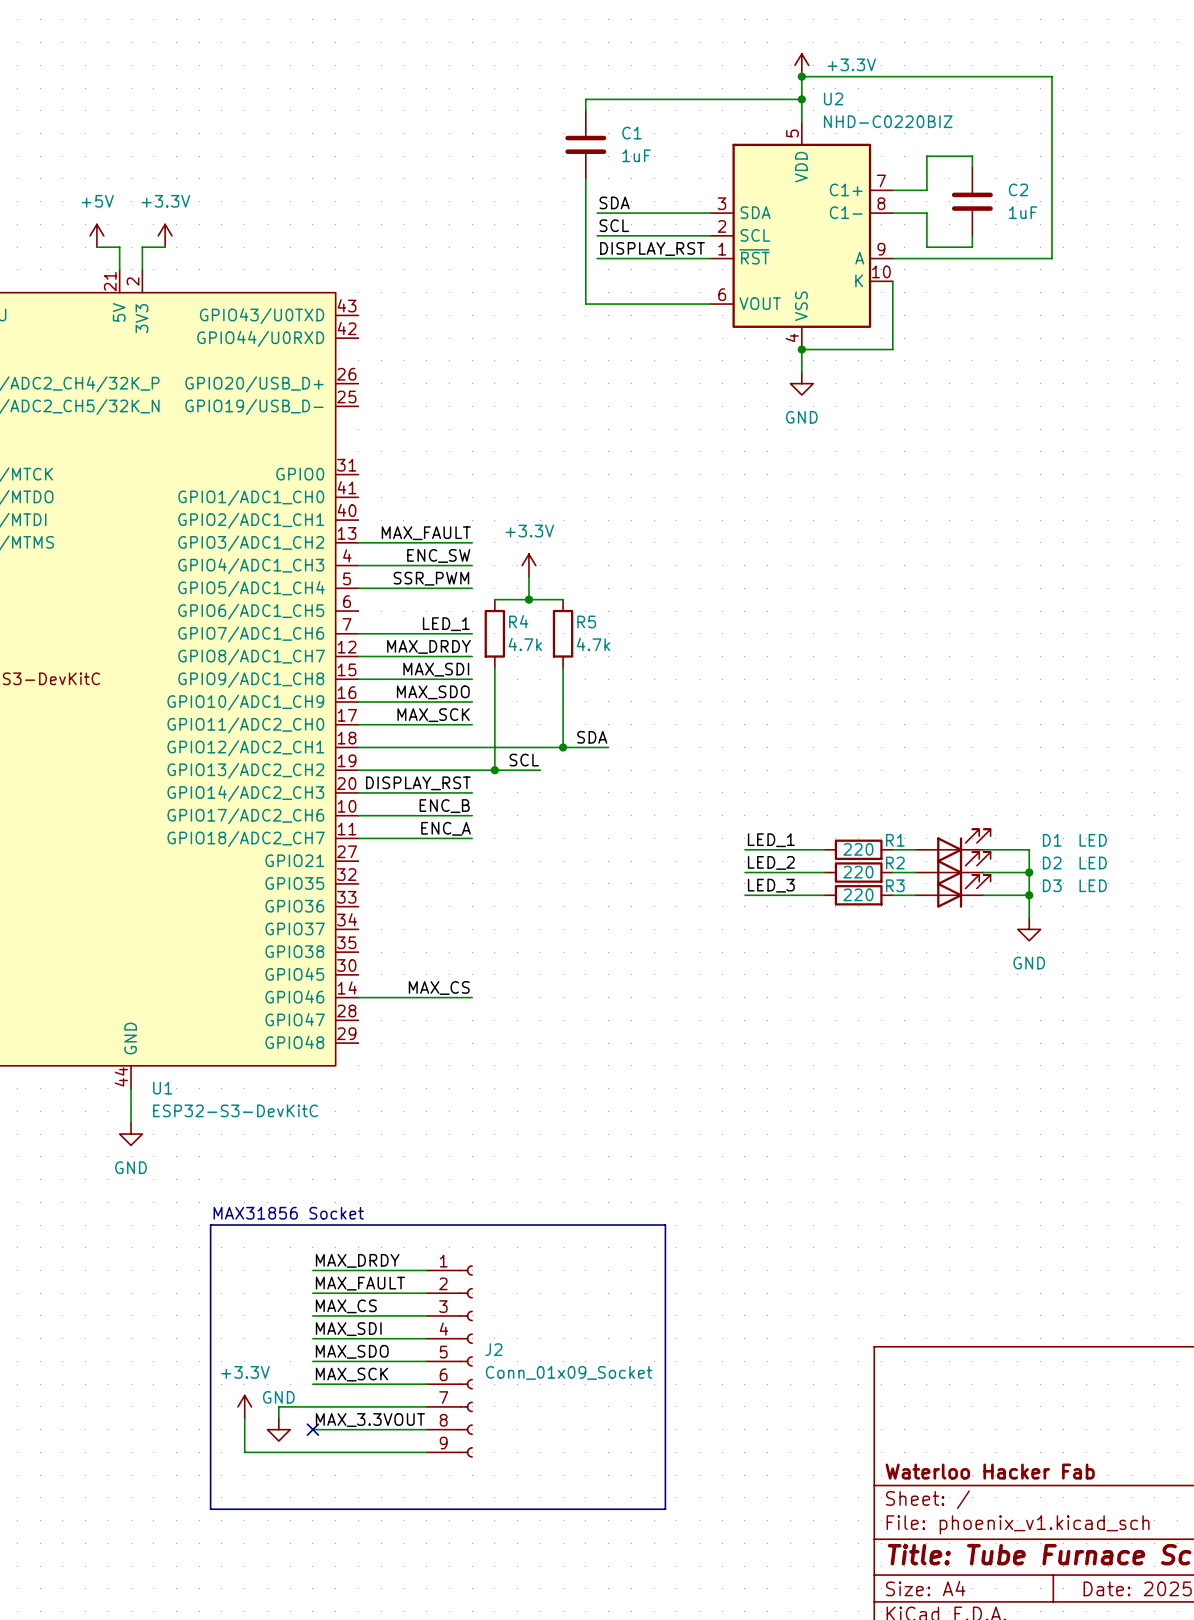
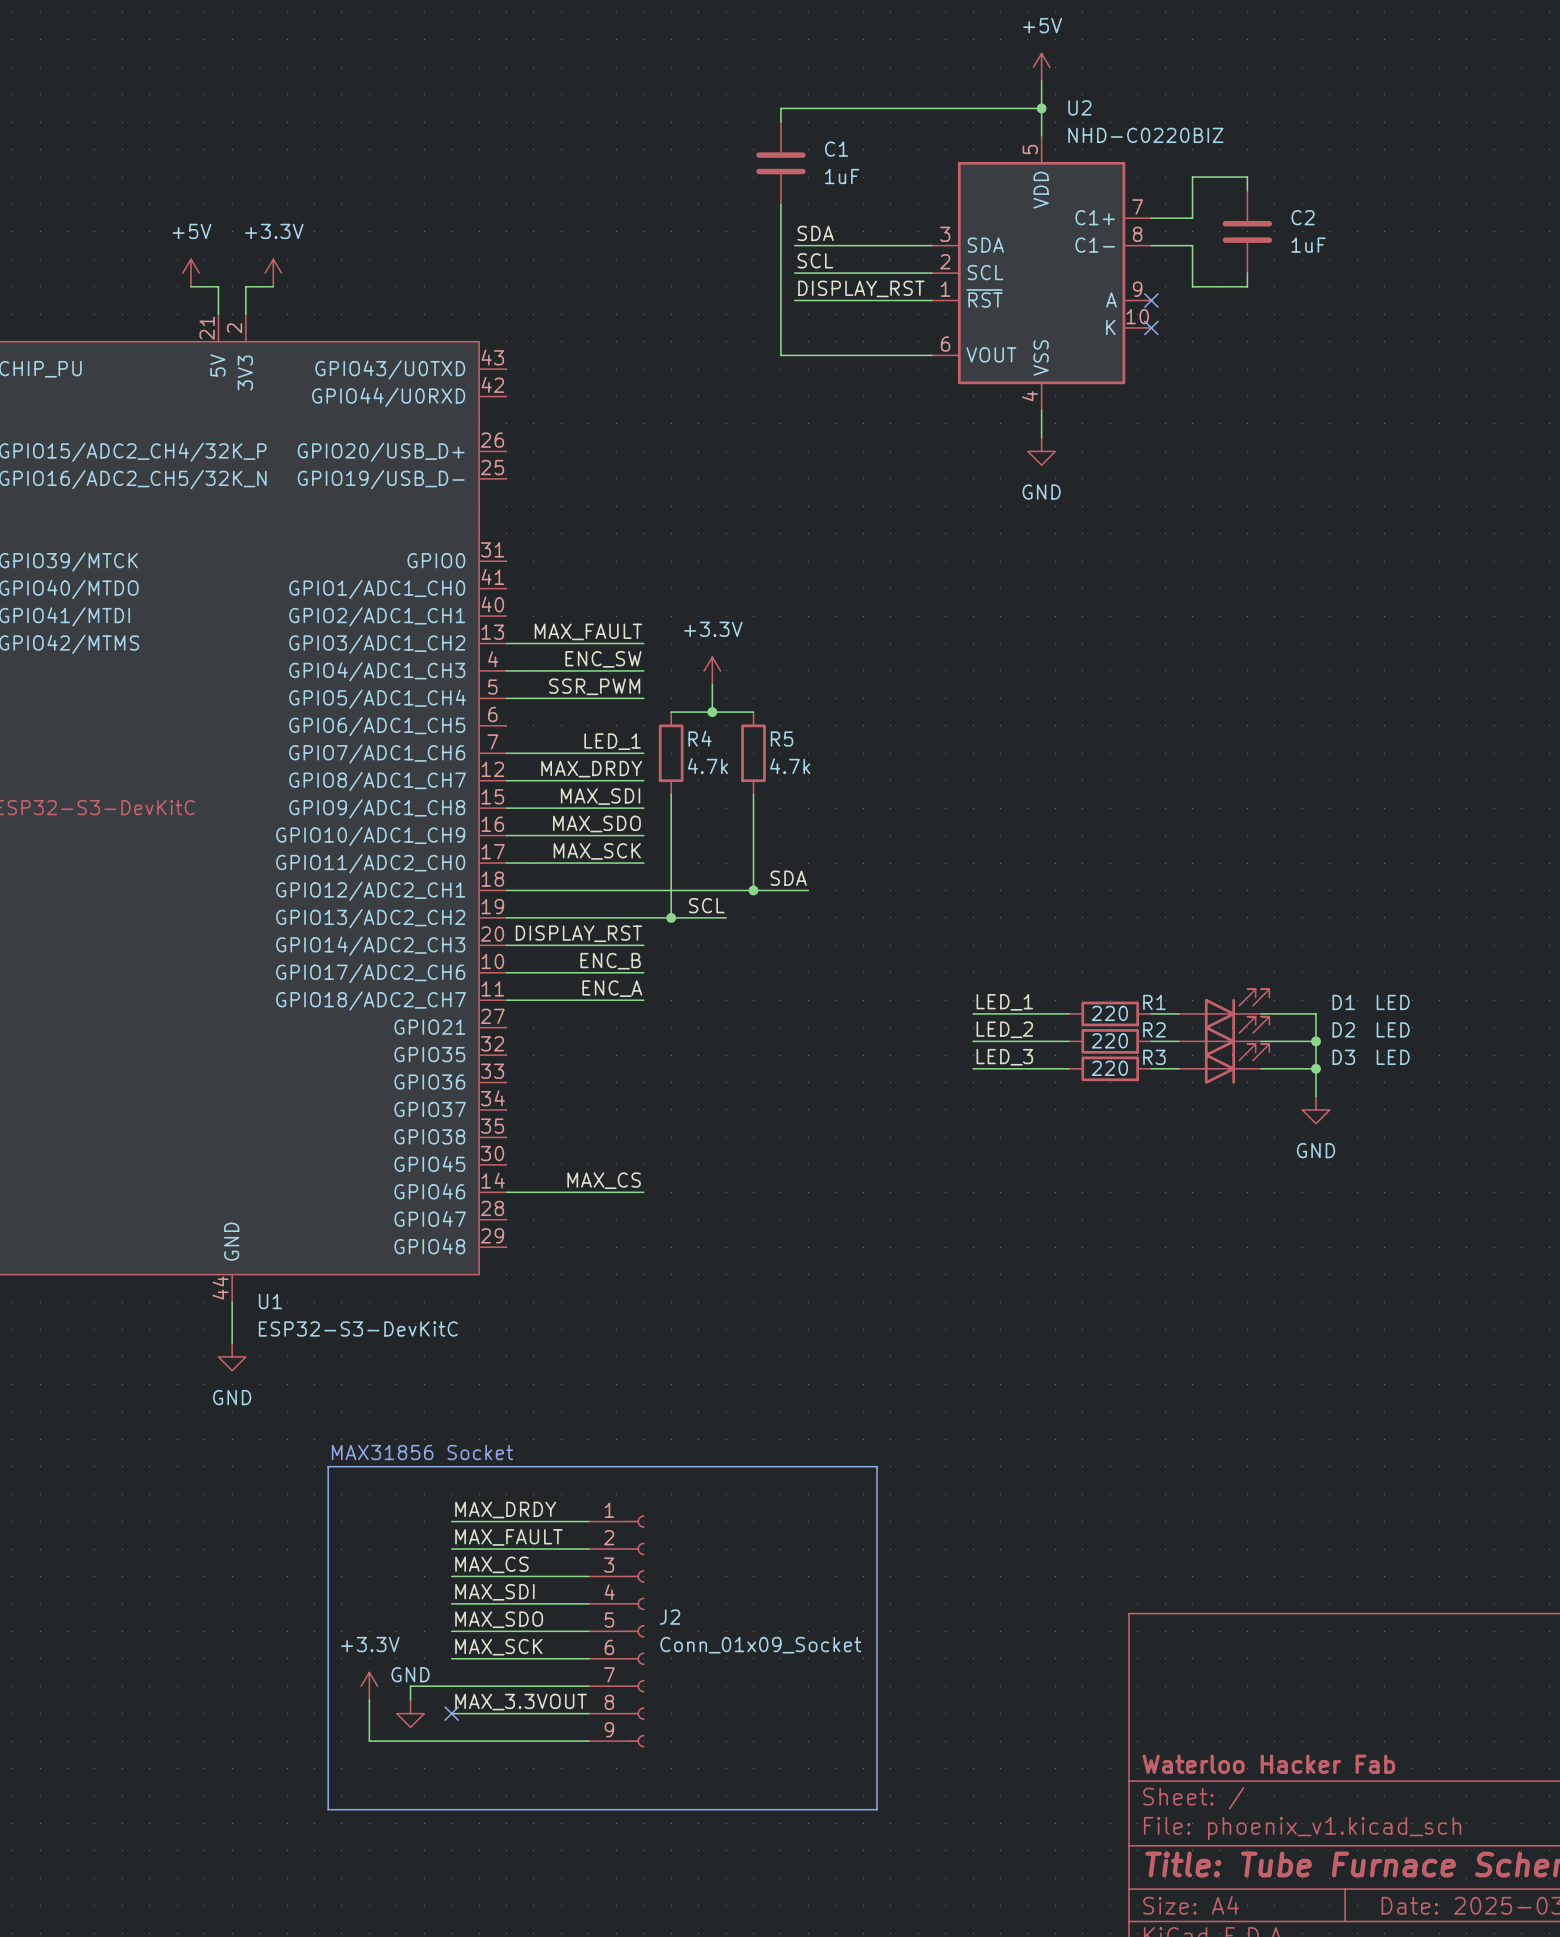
power symbol: +3.3V (801, 65) -> +5V (1041, 67)
wire: (801, 76) (1051, 76) (1051, 258) (892, 258) -> none
junction: (801, 76) -> none
no-connect mark: none -> (1151, 300)
wire: (892, 281) (892, 349) (801, 349) -> none
no-connect mark: none -> (1151, 327)
junction: (801, 349) -> none

